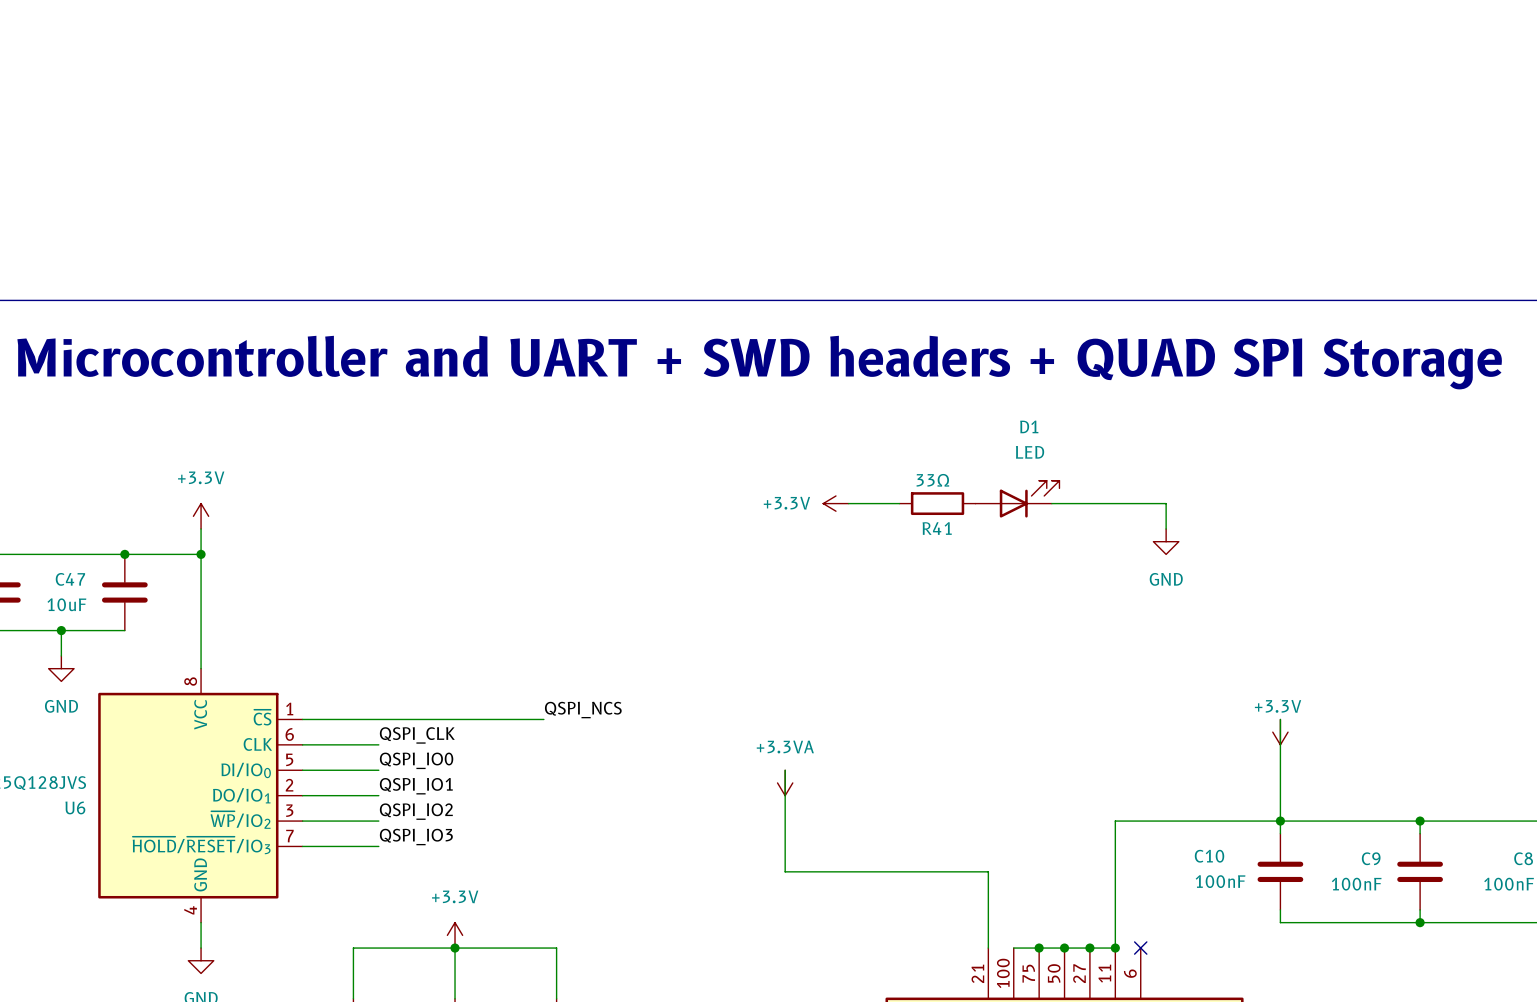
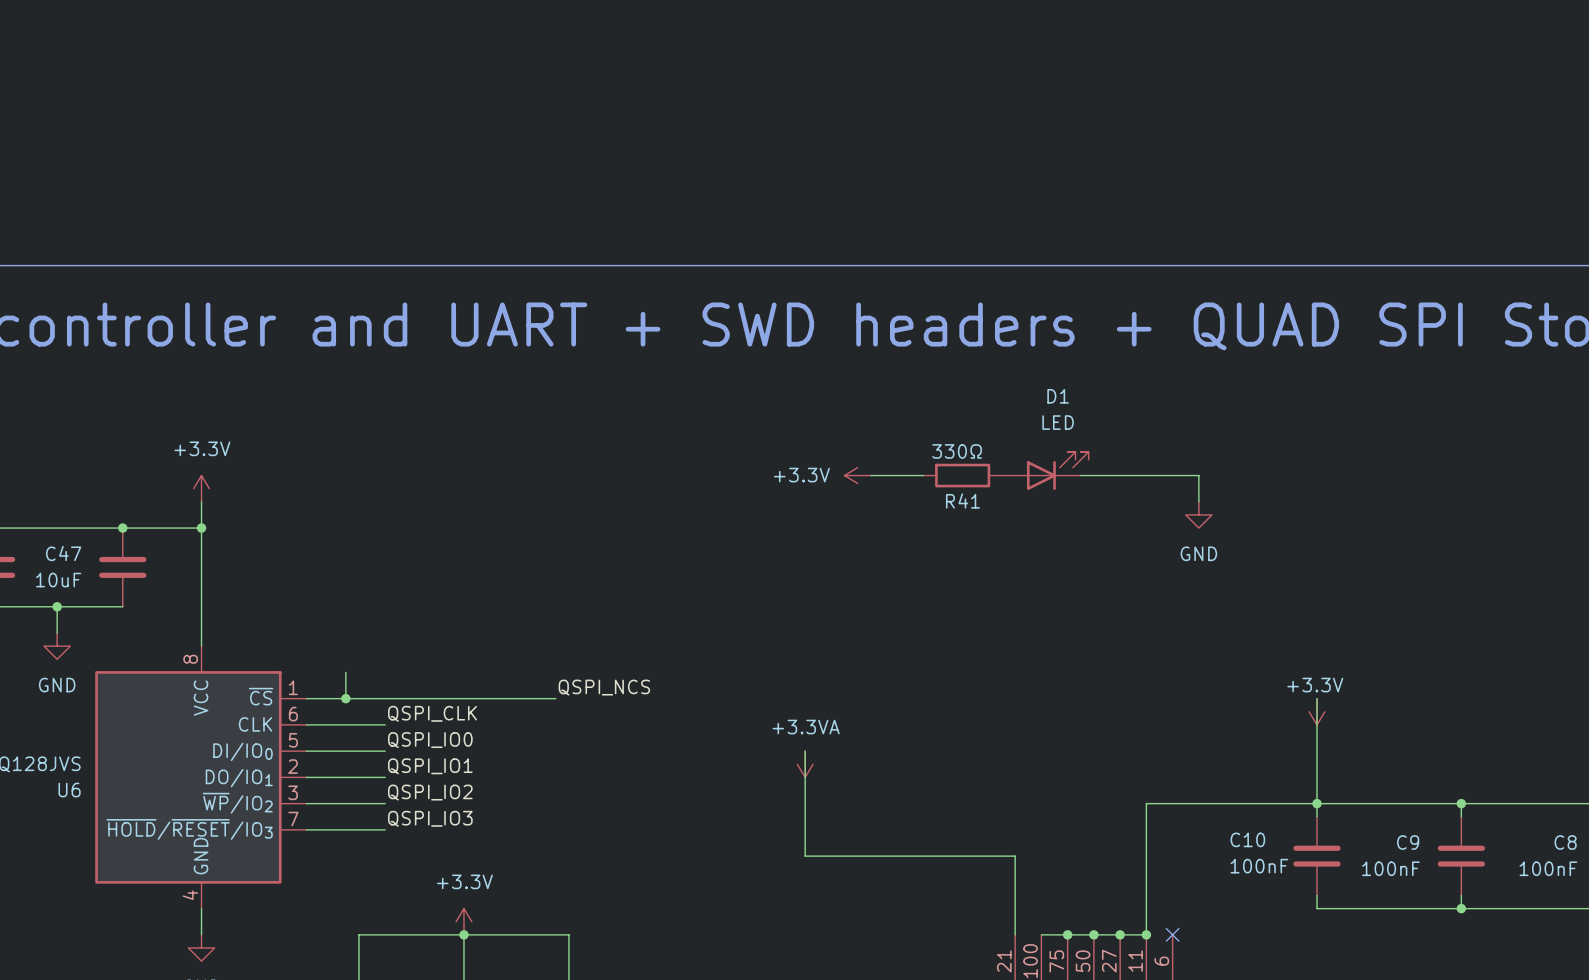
R41 value: 33Ω (932, 480) -> 330Ω (957, 451)
wire: none -> (345, 672) (345, 698)
junction: none -> (345, 698)

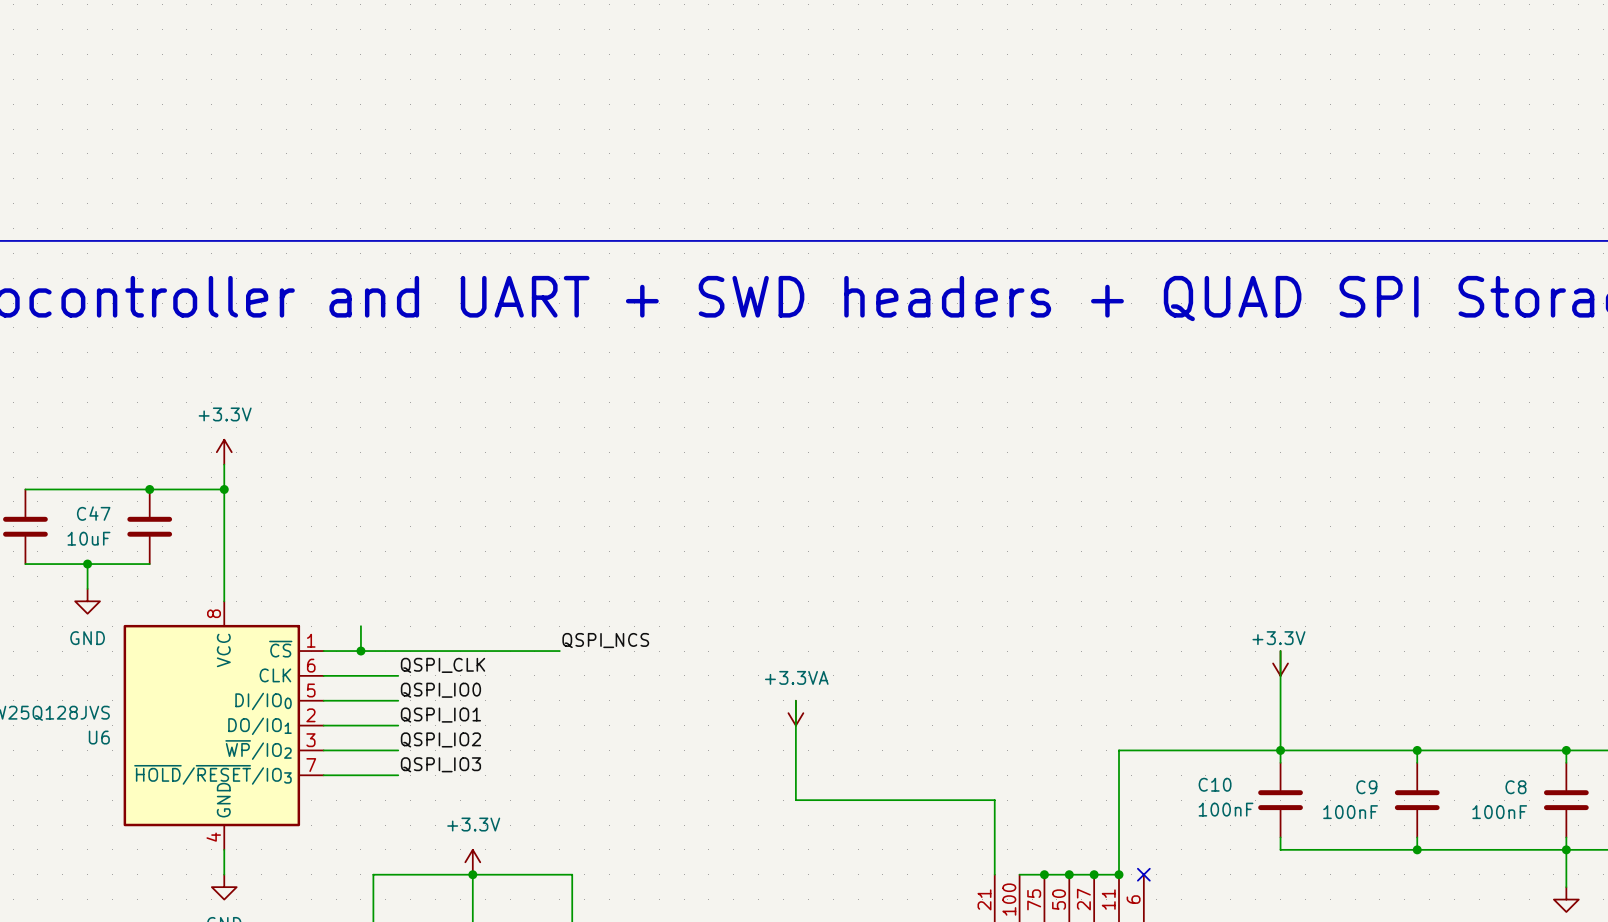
D1: LED (1045, 470) -> none
power symbol: +3.3V (857, 475) -> none
wire: (870, 475) (923, 475) -> none
R41: 330Ω (962, 475) -> none
wire: (1080, 475) (1198, 475) (1198, 501) -> none
power symbol: GND (1198, 514) -> none

